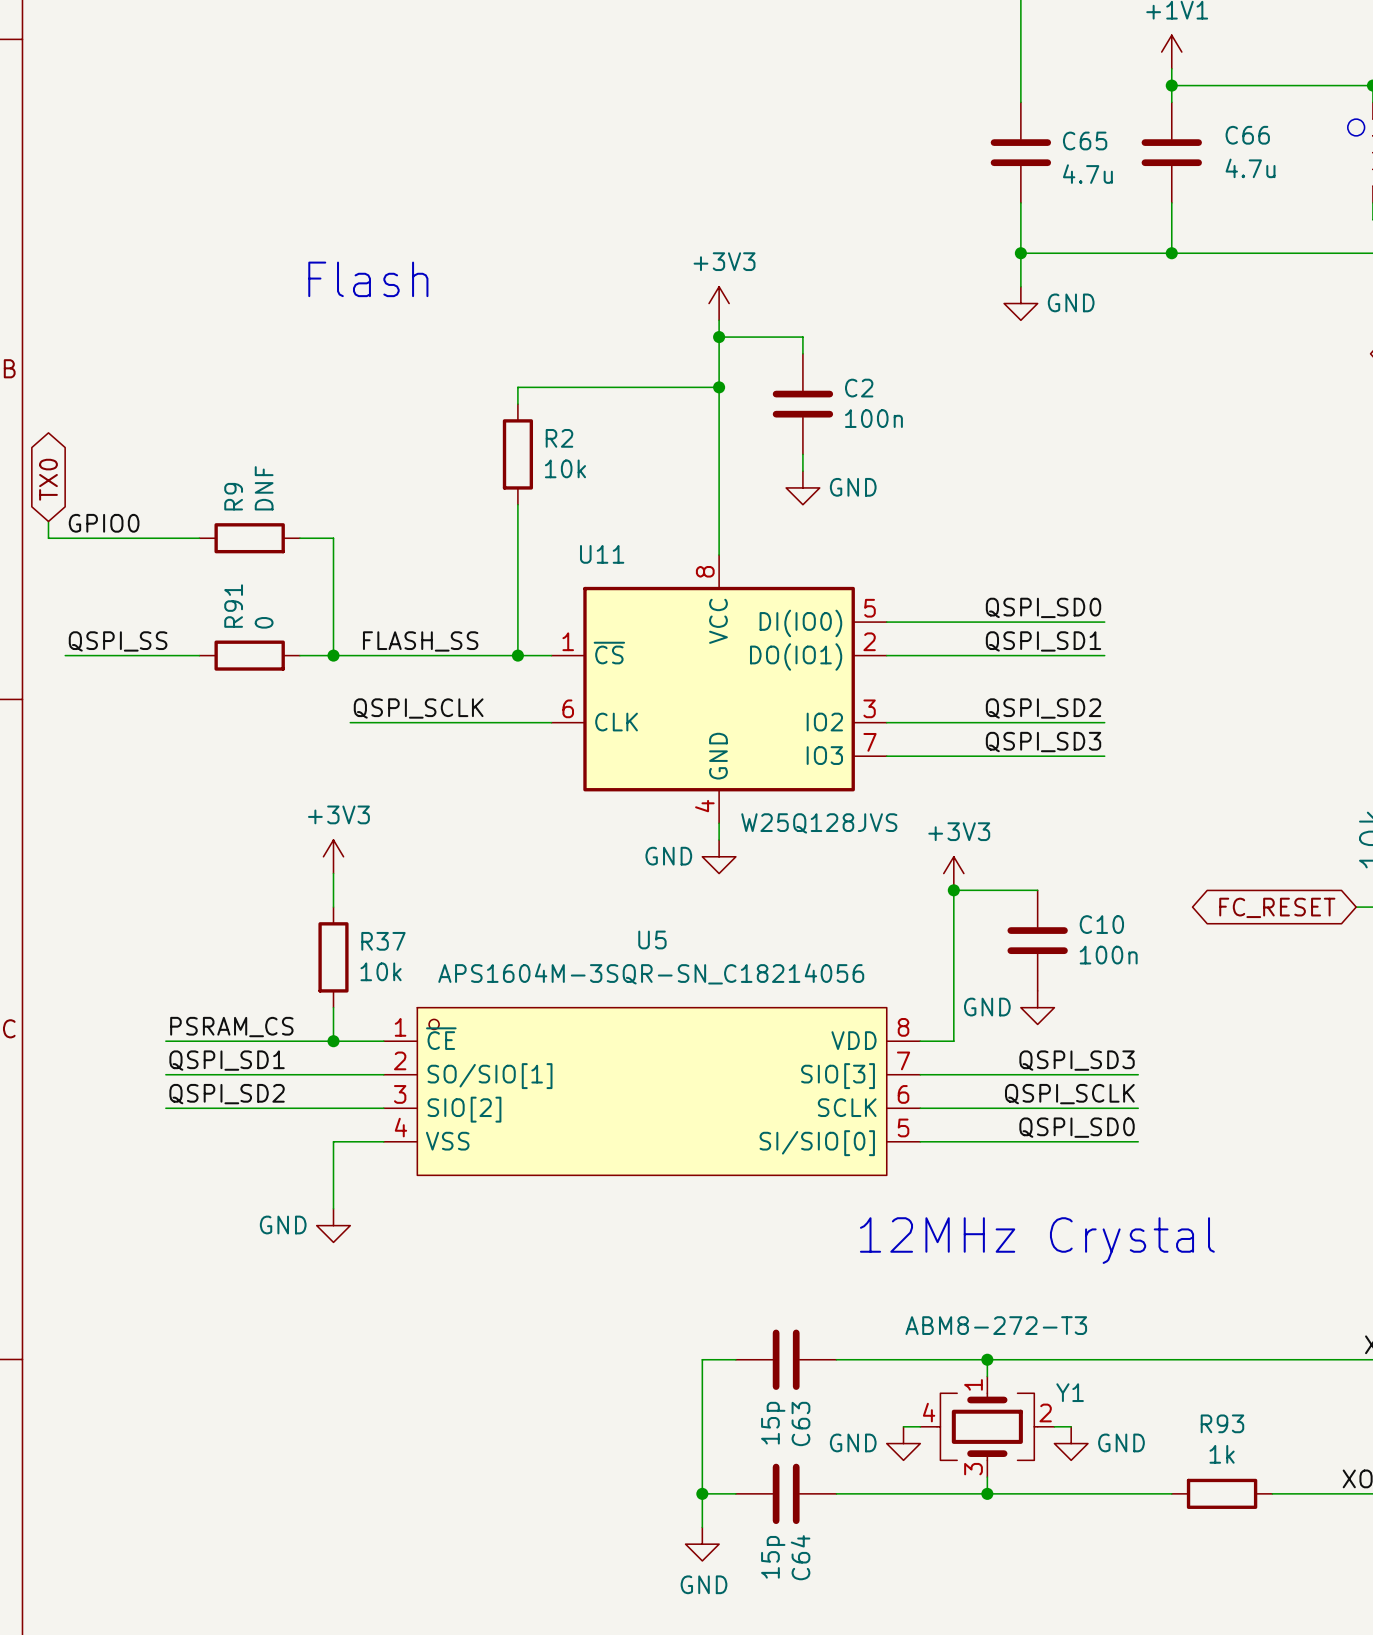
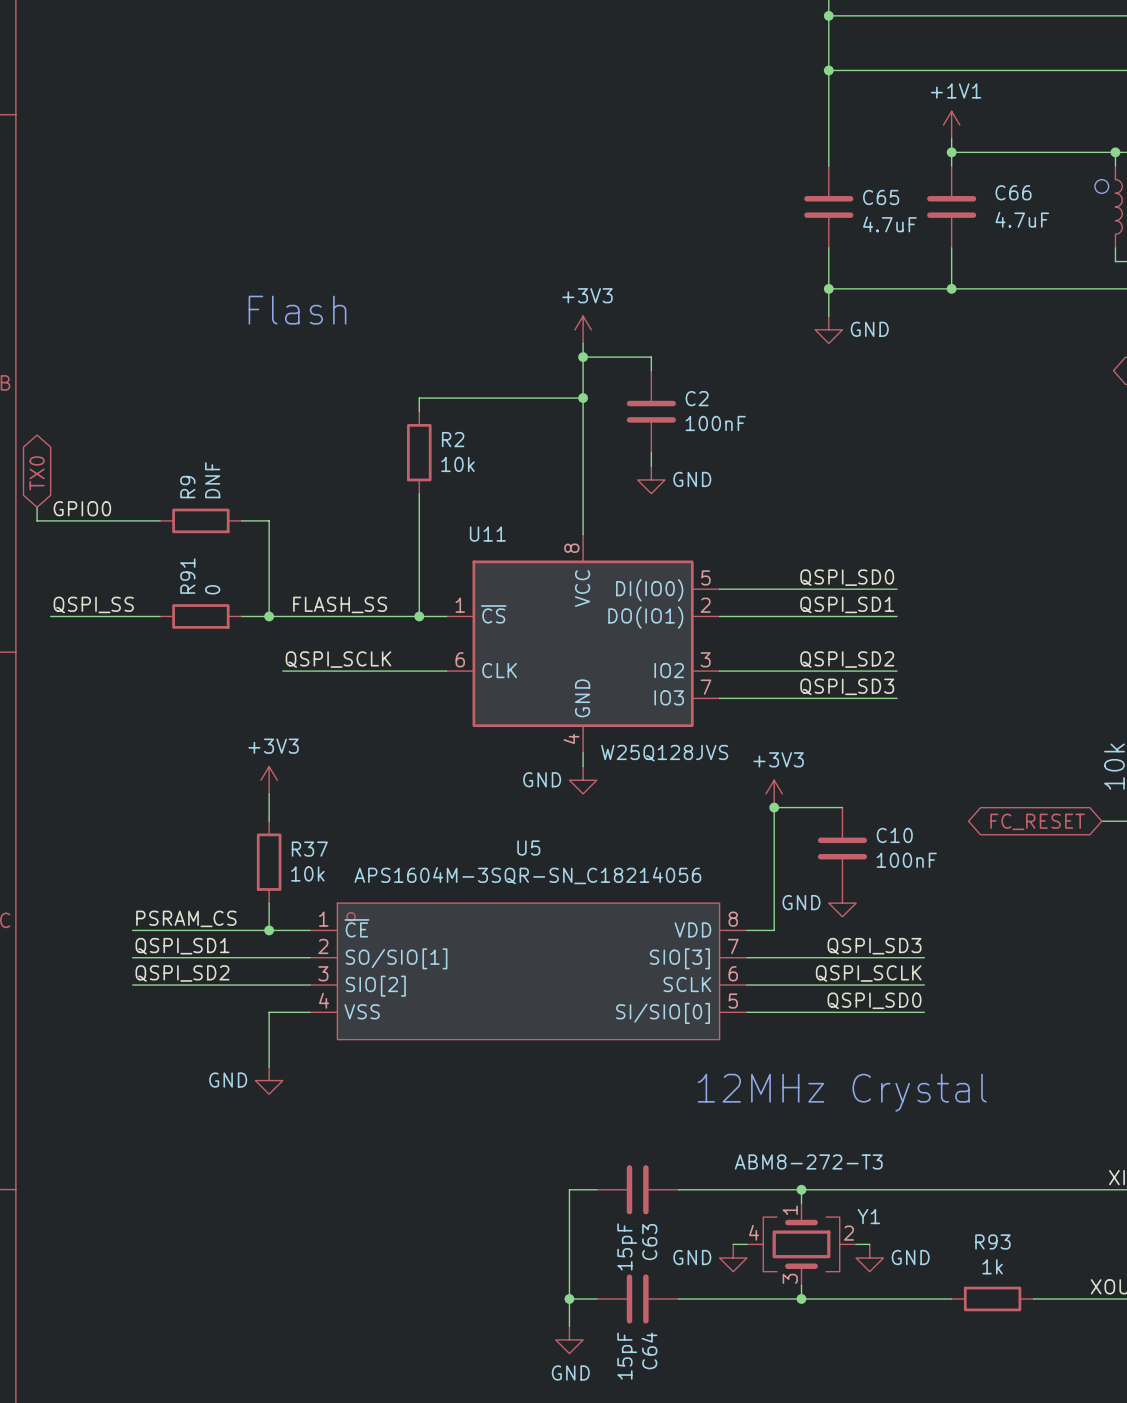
C66 value: 4.7u (1250, 168) -> 4.7uF (1022, 219)
C65 value: 4.7u (1087, 174) -> 4.7uF (889, 224)
C2 value: 100n (873, 418) -> 100nF (715, 423)
C10 value: 100n (1108, 955) -> 100nF (906, 860)
C63 value: 15p (773, 1423) -> 15pF (627, 1246)
C64 value: 15p (773, 1557) -> 15pF (627, 1356)

